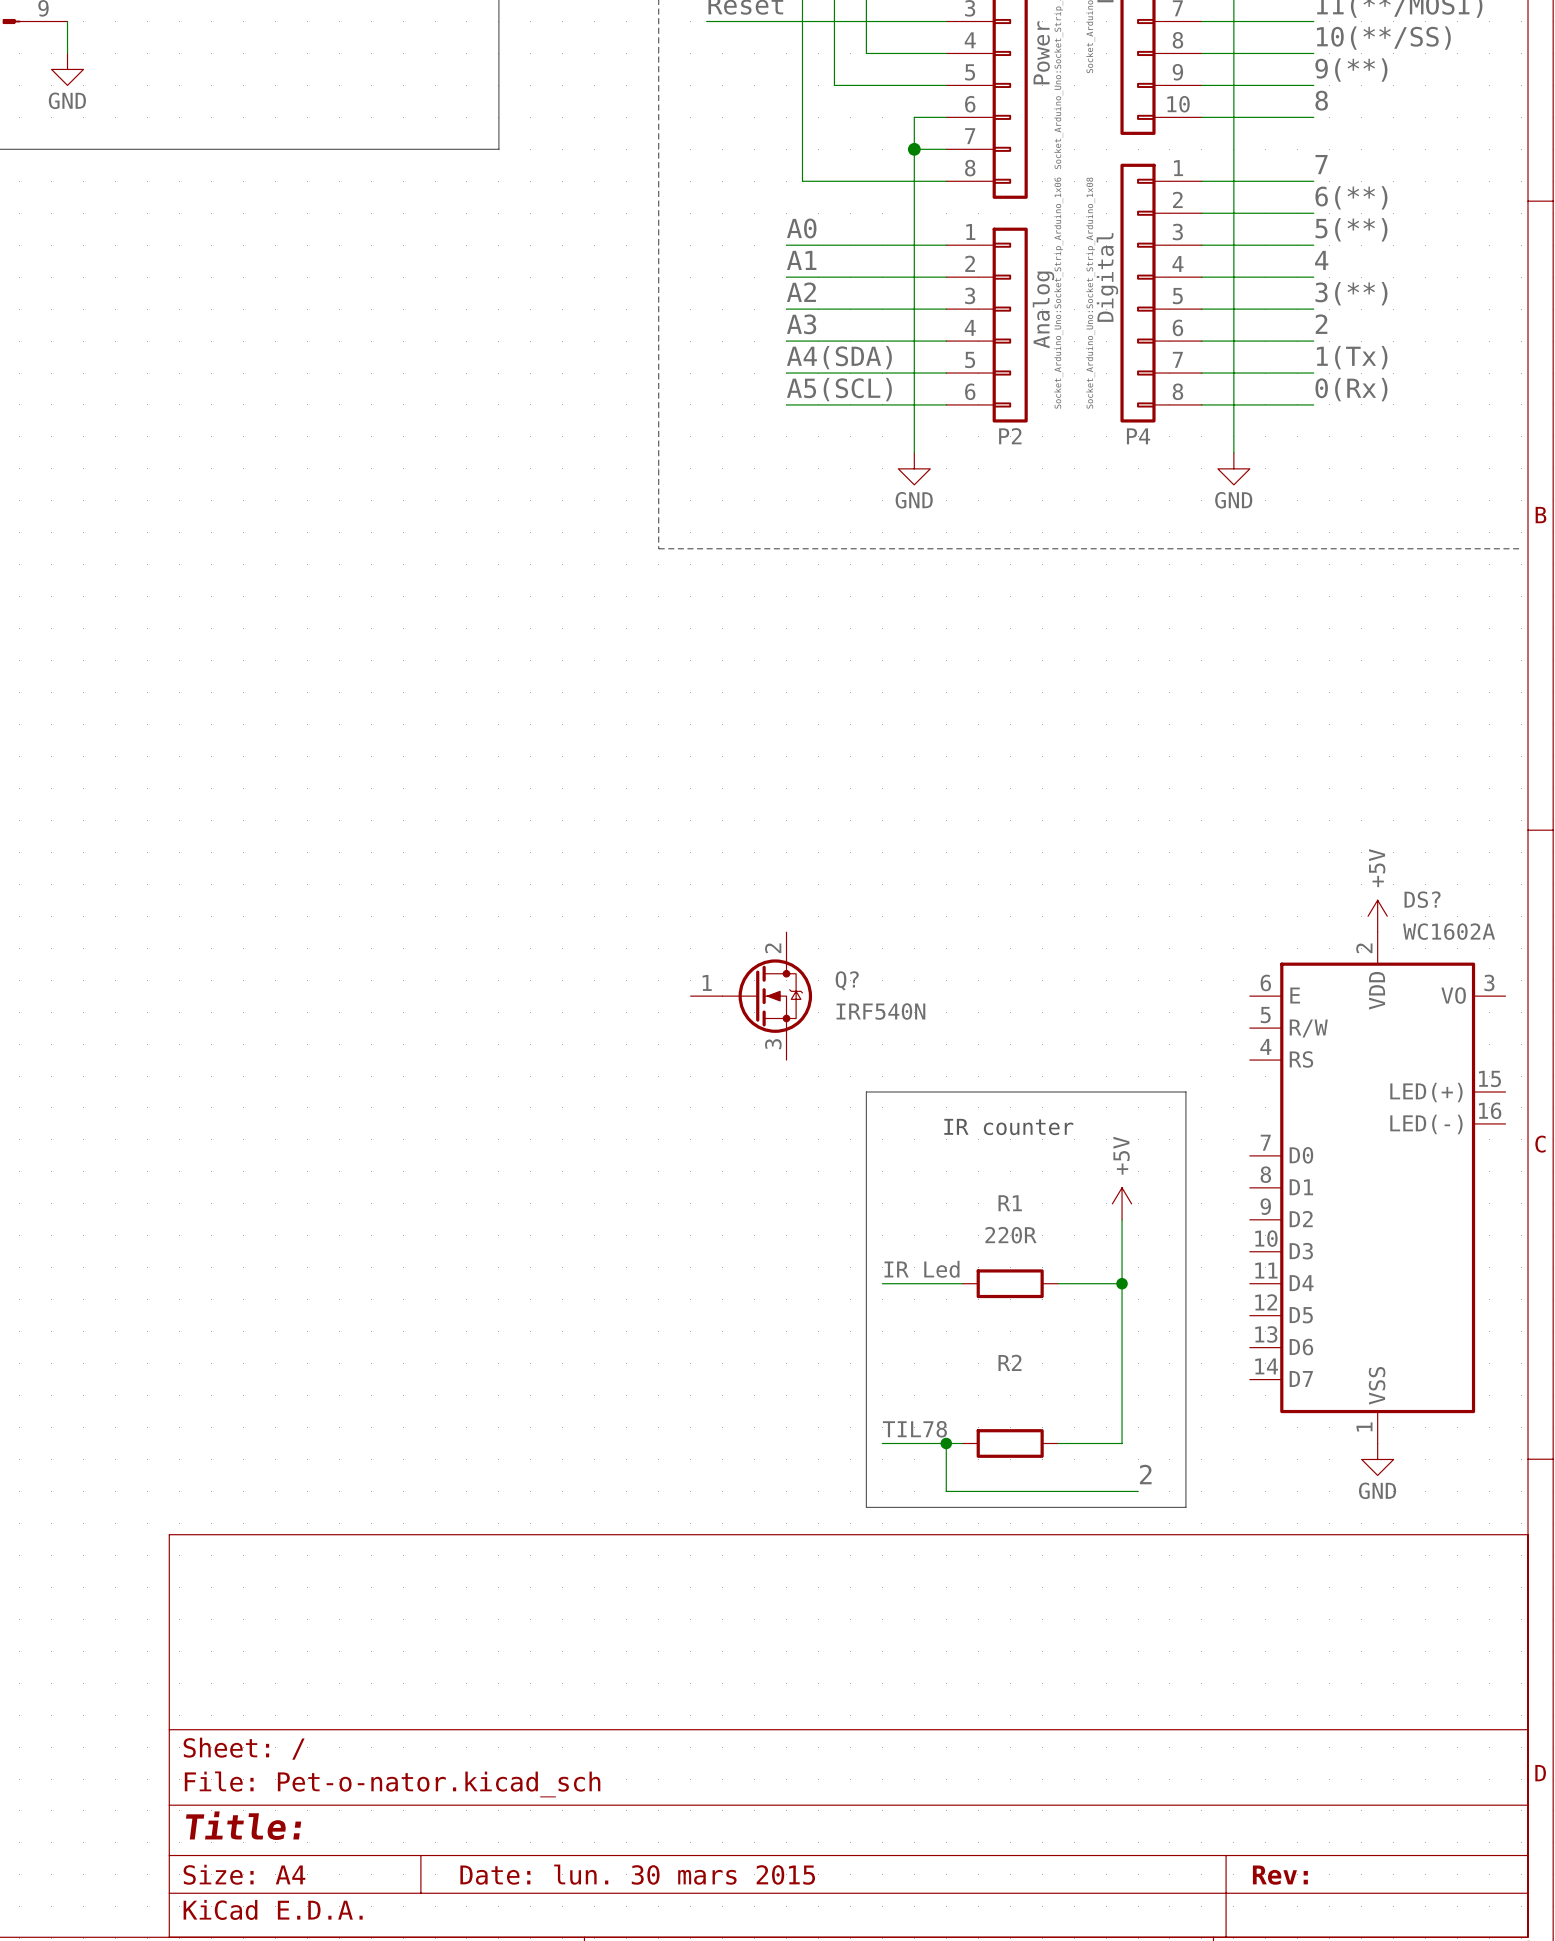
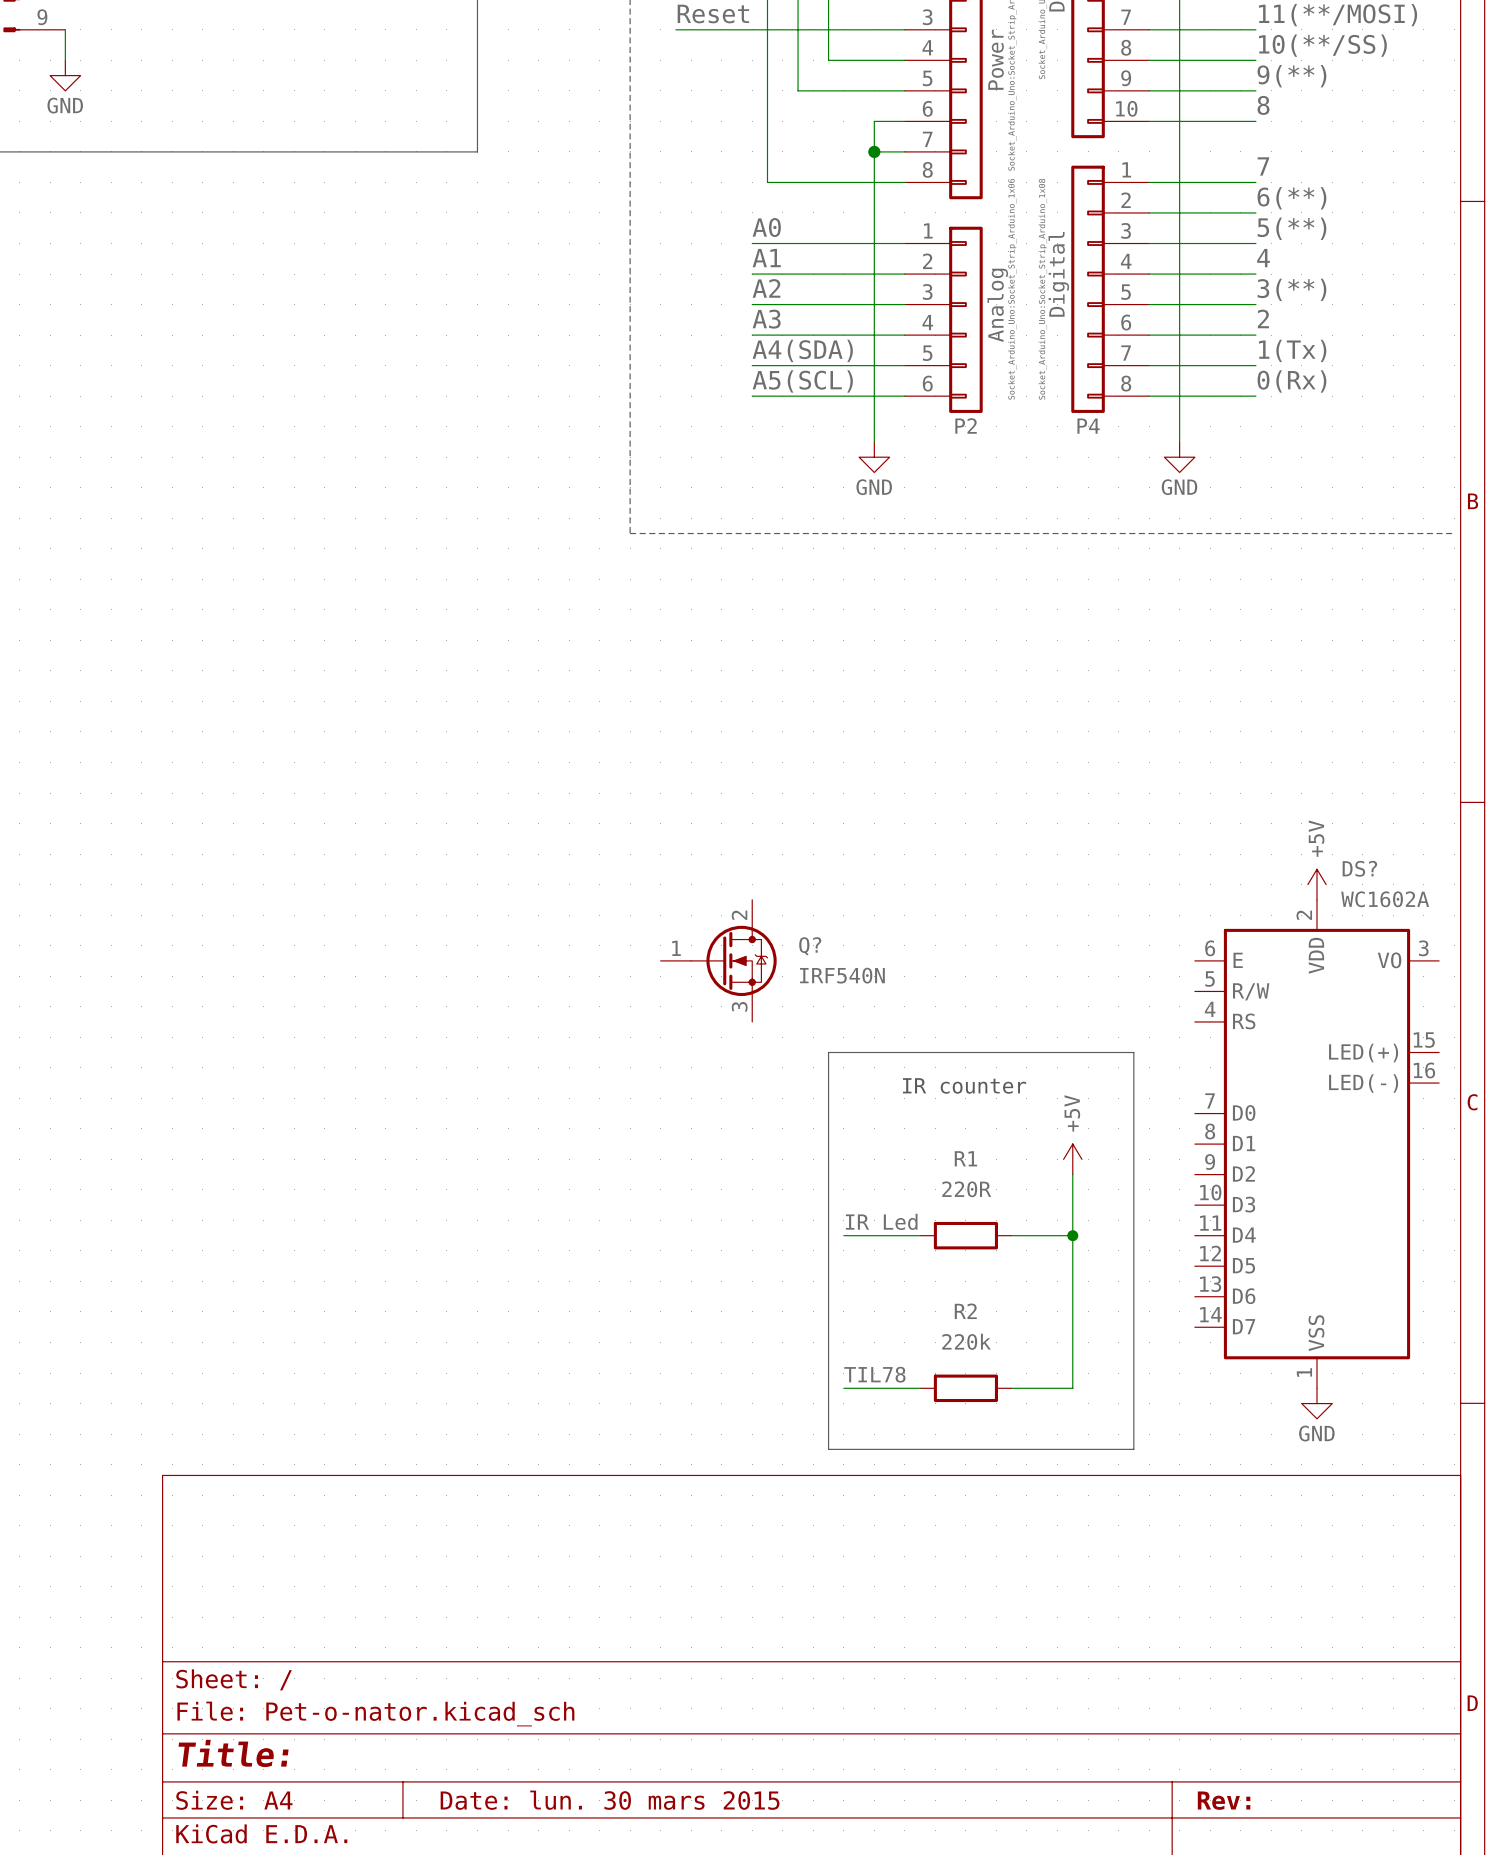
R2 value: none -> 220k (966, 1341)
wire: (946, 1443) (946, 1491) (1138, 1491) -> none
junction: (946, 1443) -> none
label: 2 (1145, 1474) -> none

